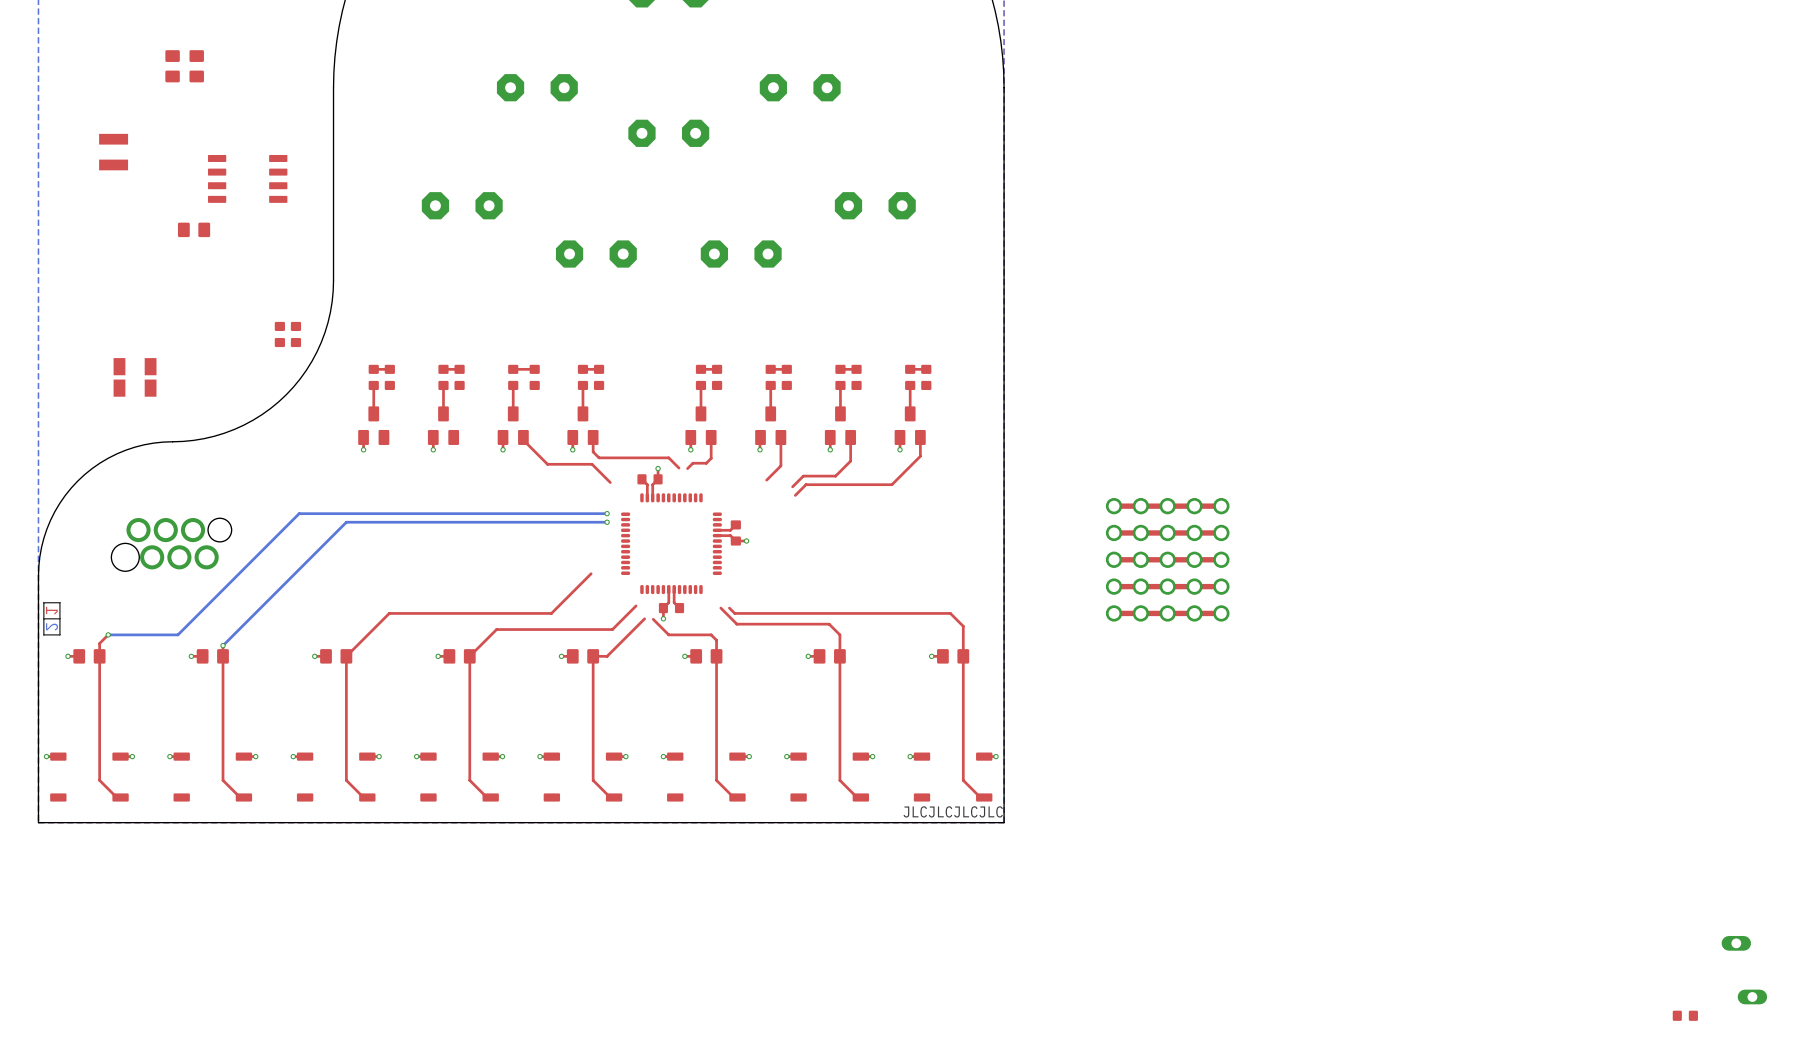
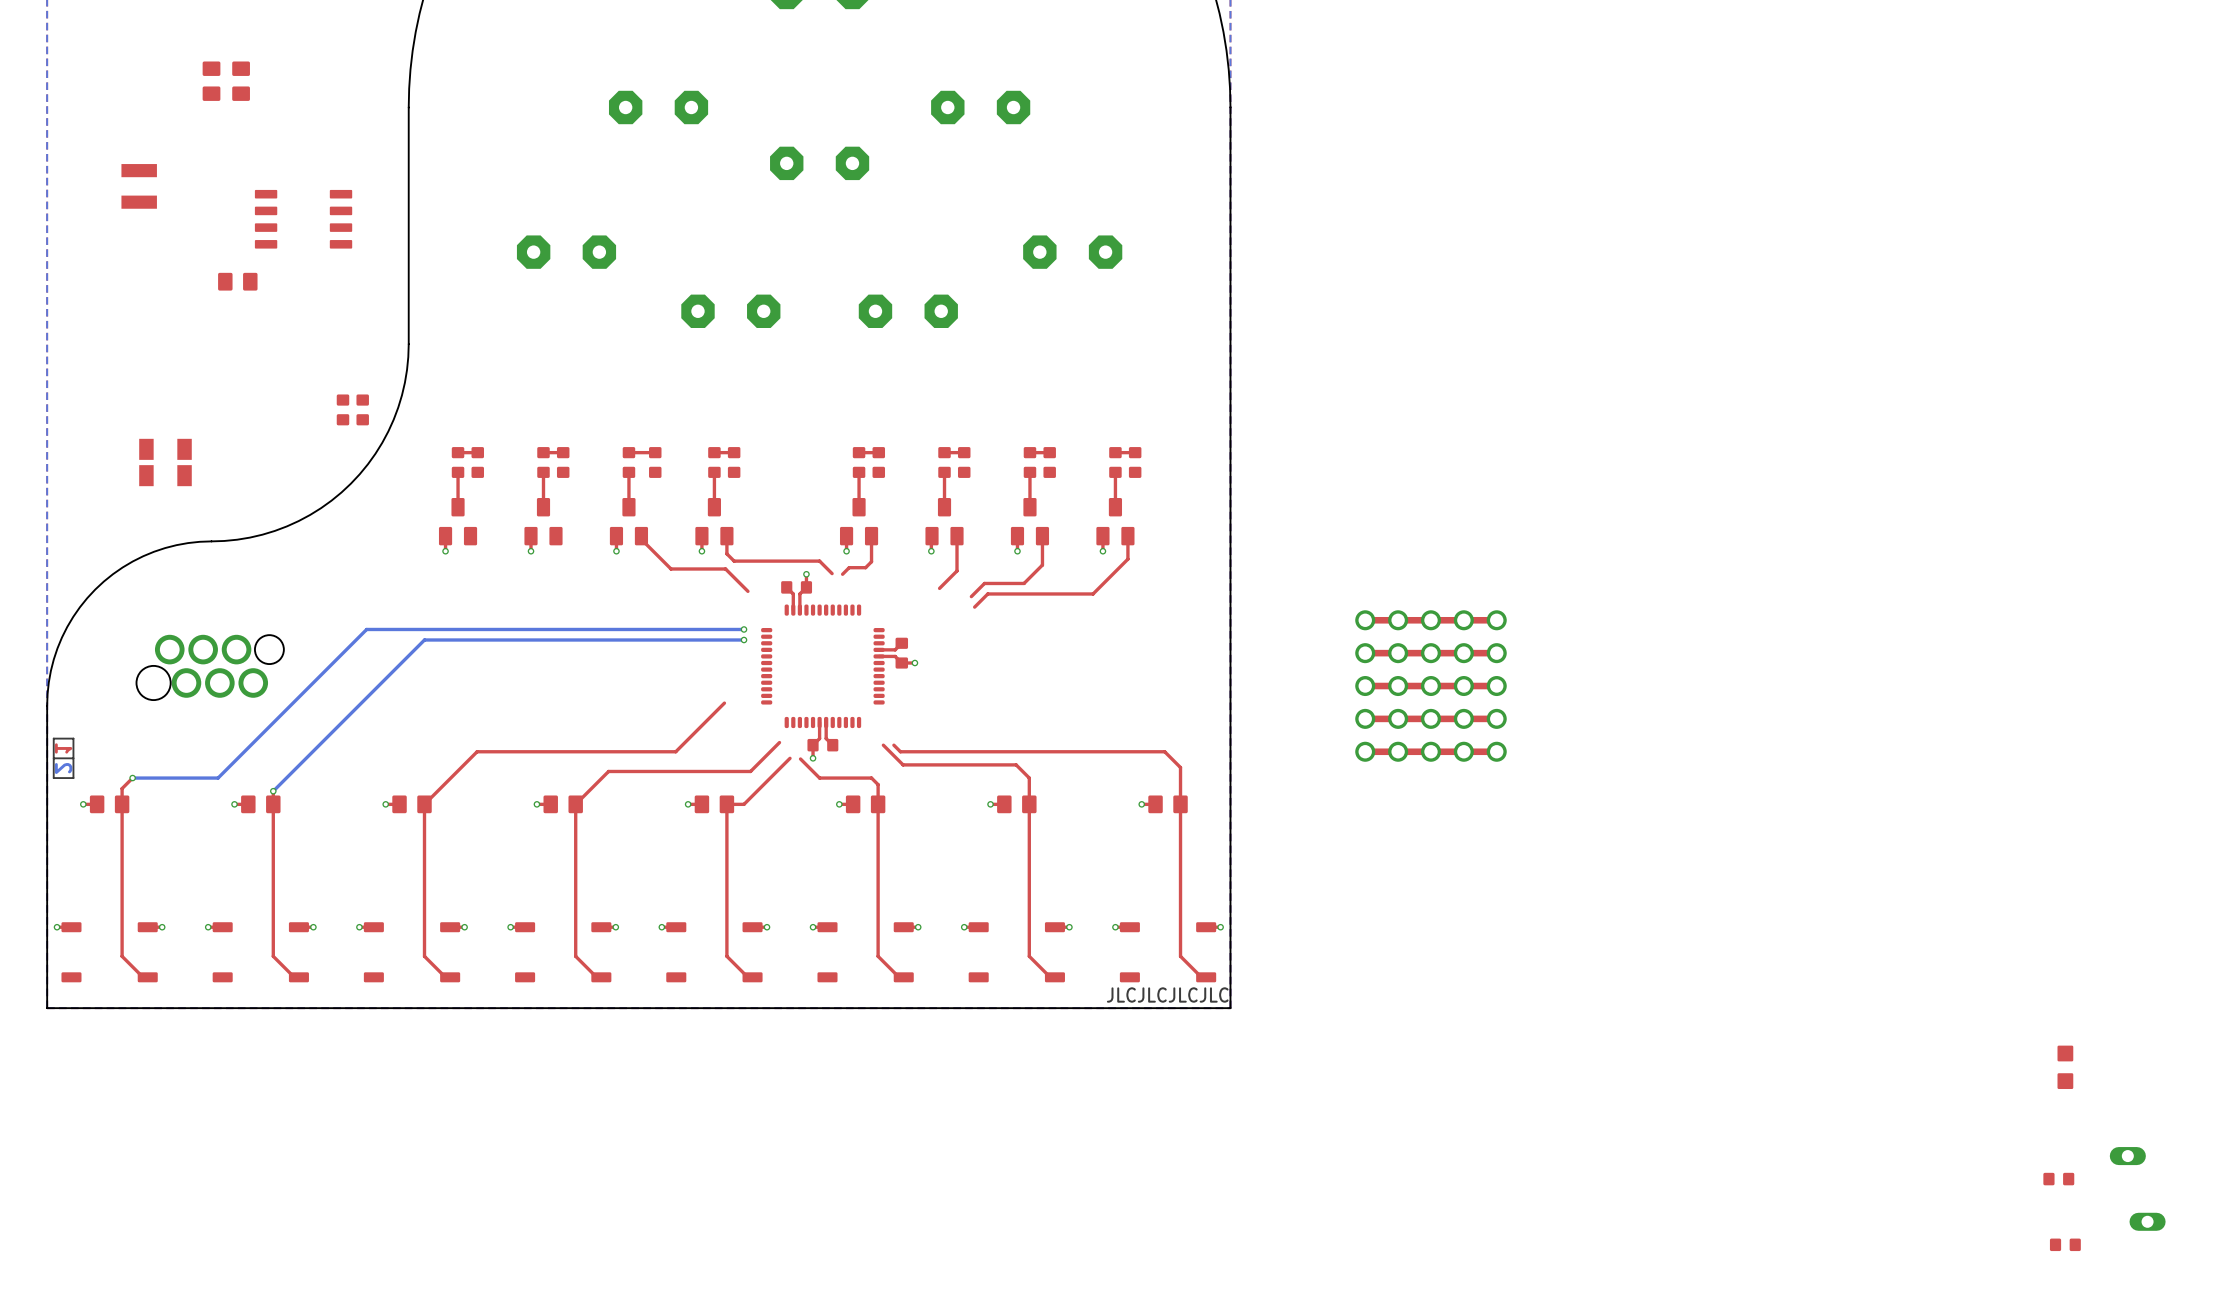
part: none -> (2065, 1067)
part: none -> (2058, 1179)

